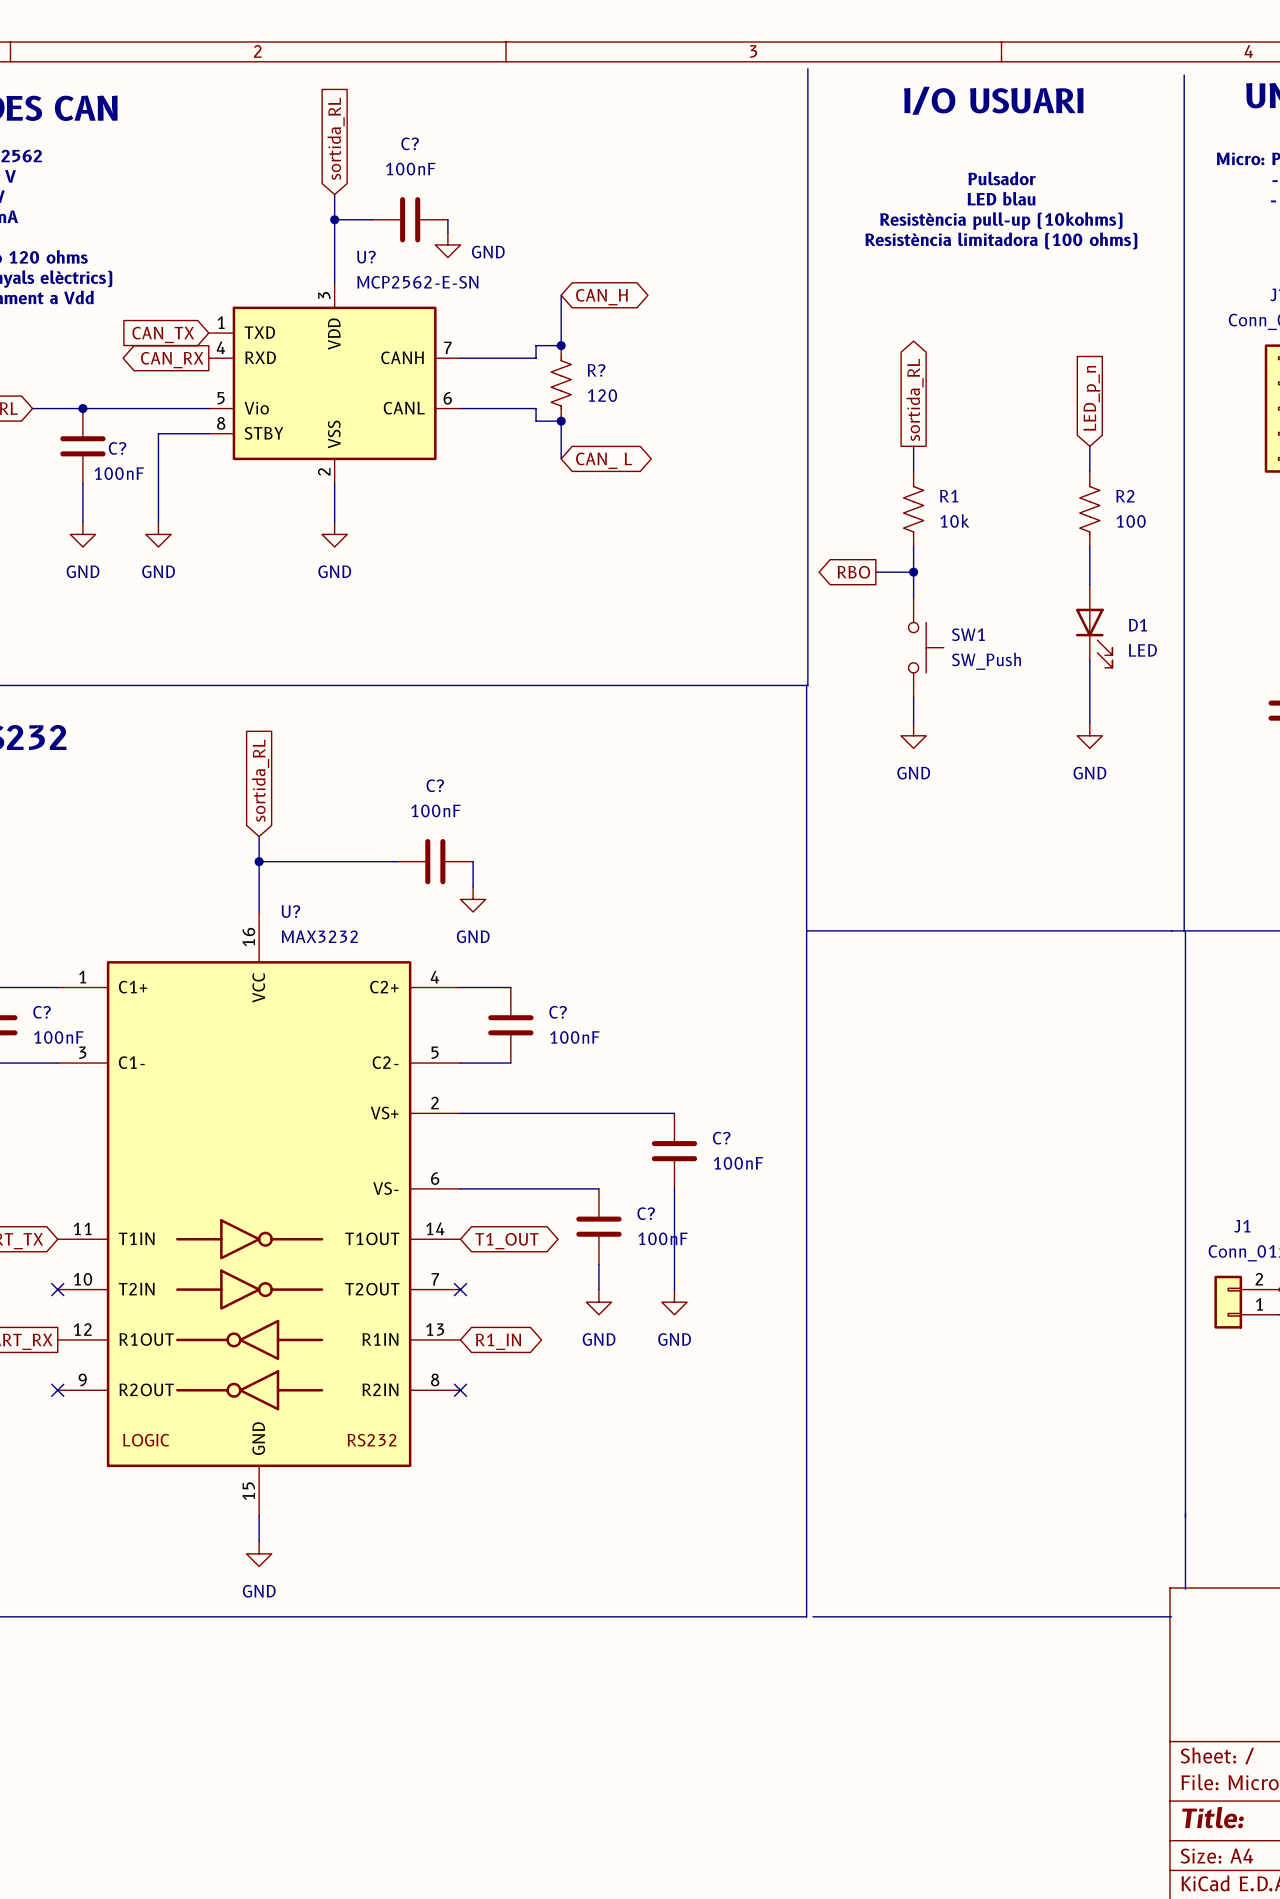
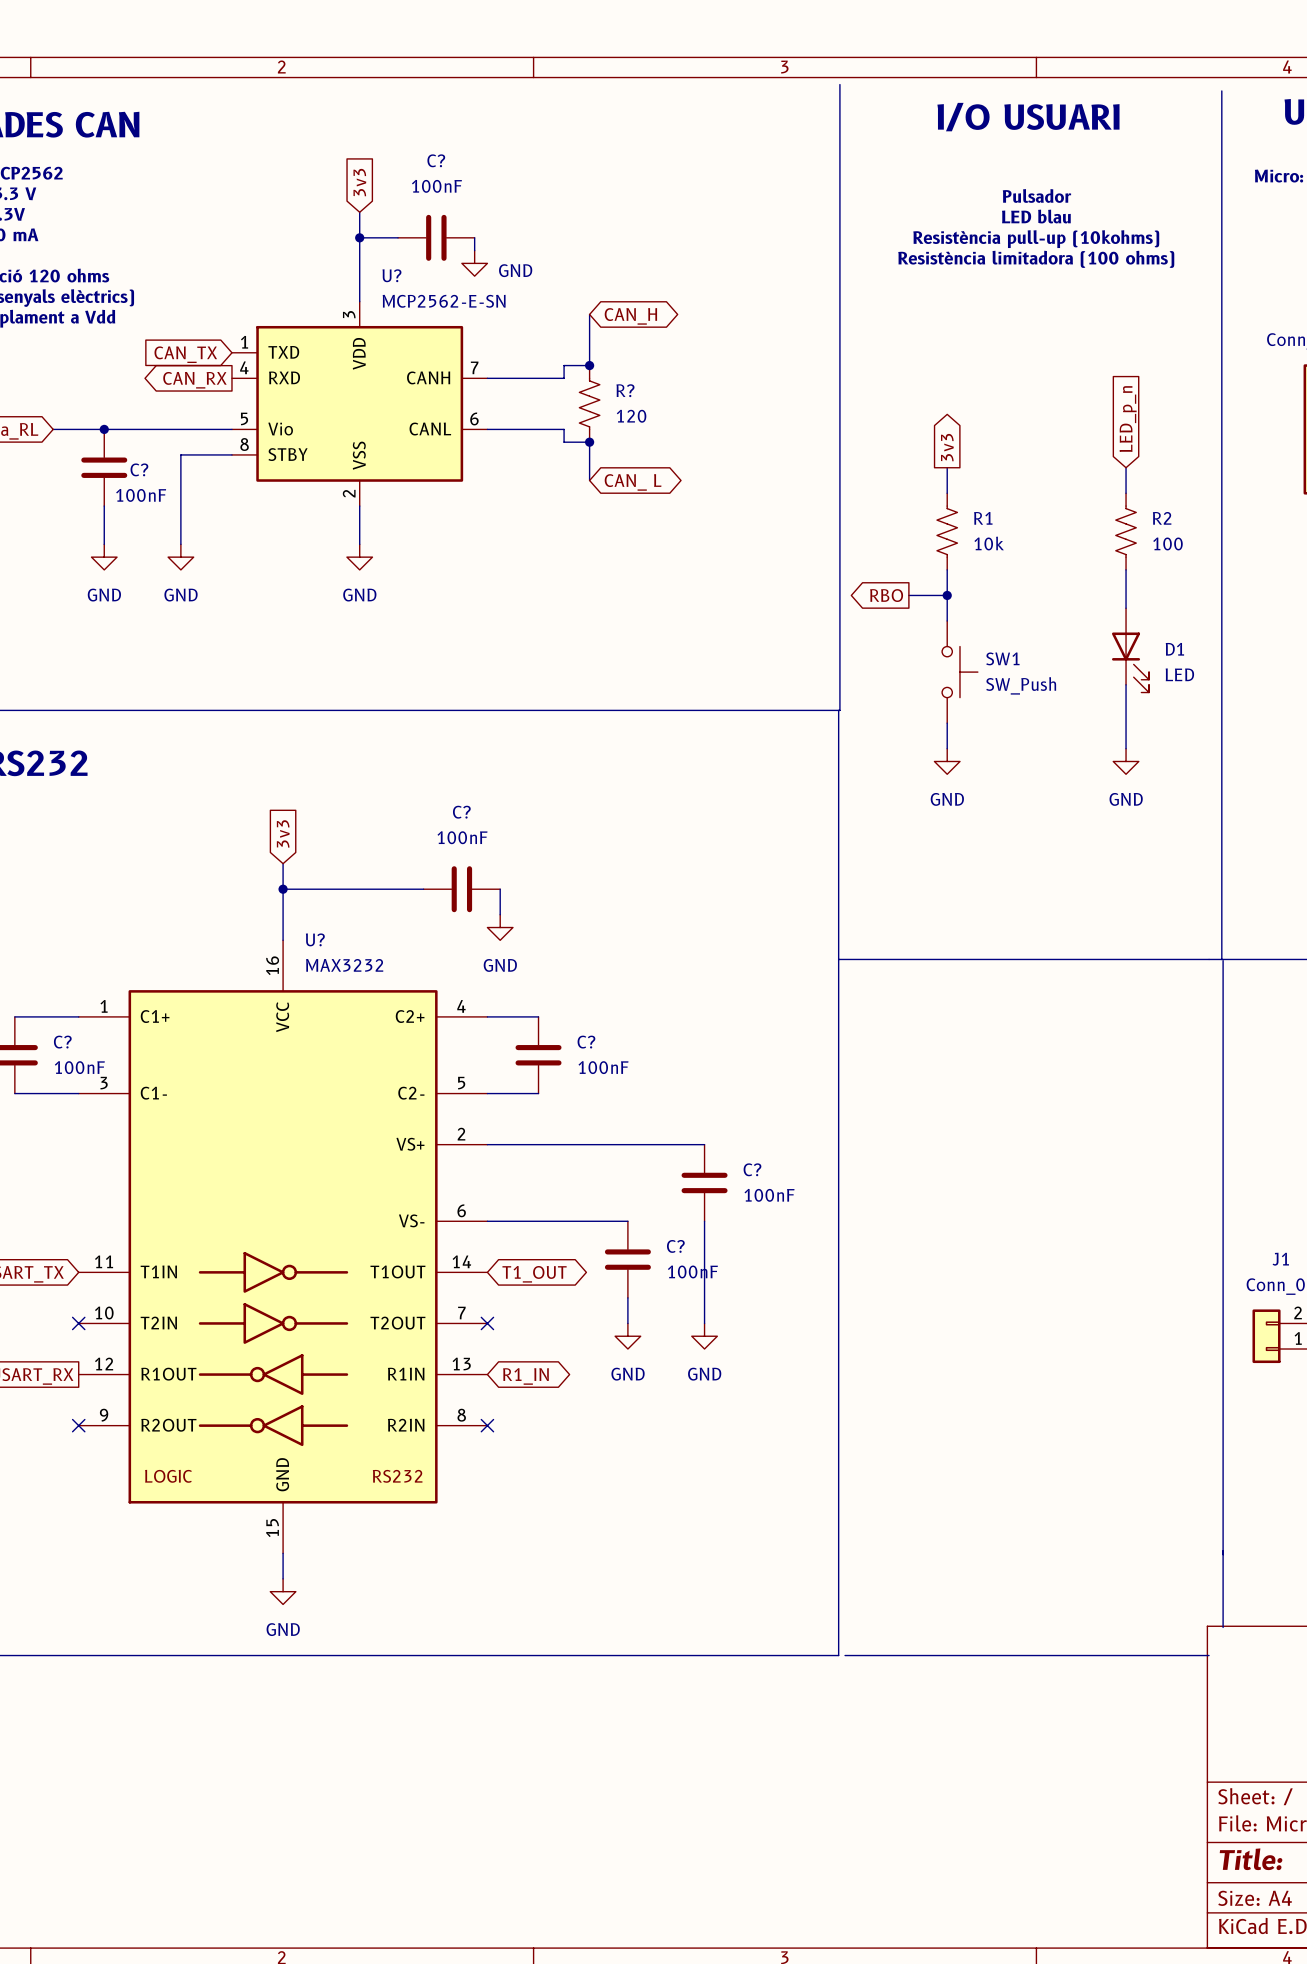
global label: sortida_RL (336, 138) -> 3v3 (359, 182)
global label: sortida_RL (915, 399) -> 3v3 (947, 447)
global label: sortida_RL (260, 780) -> 3v3 (283, 833)

